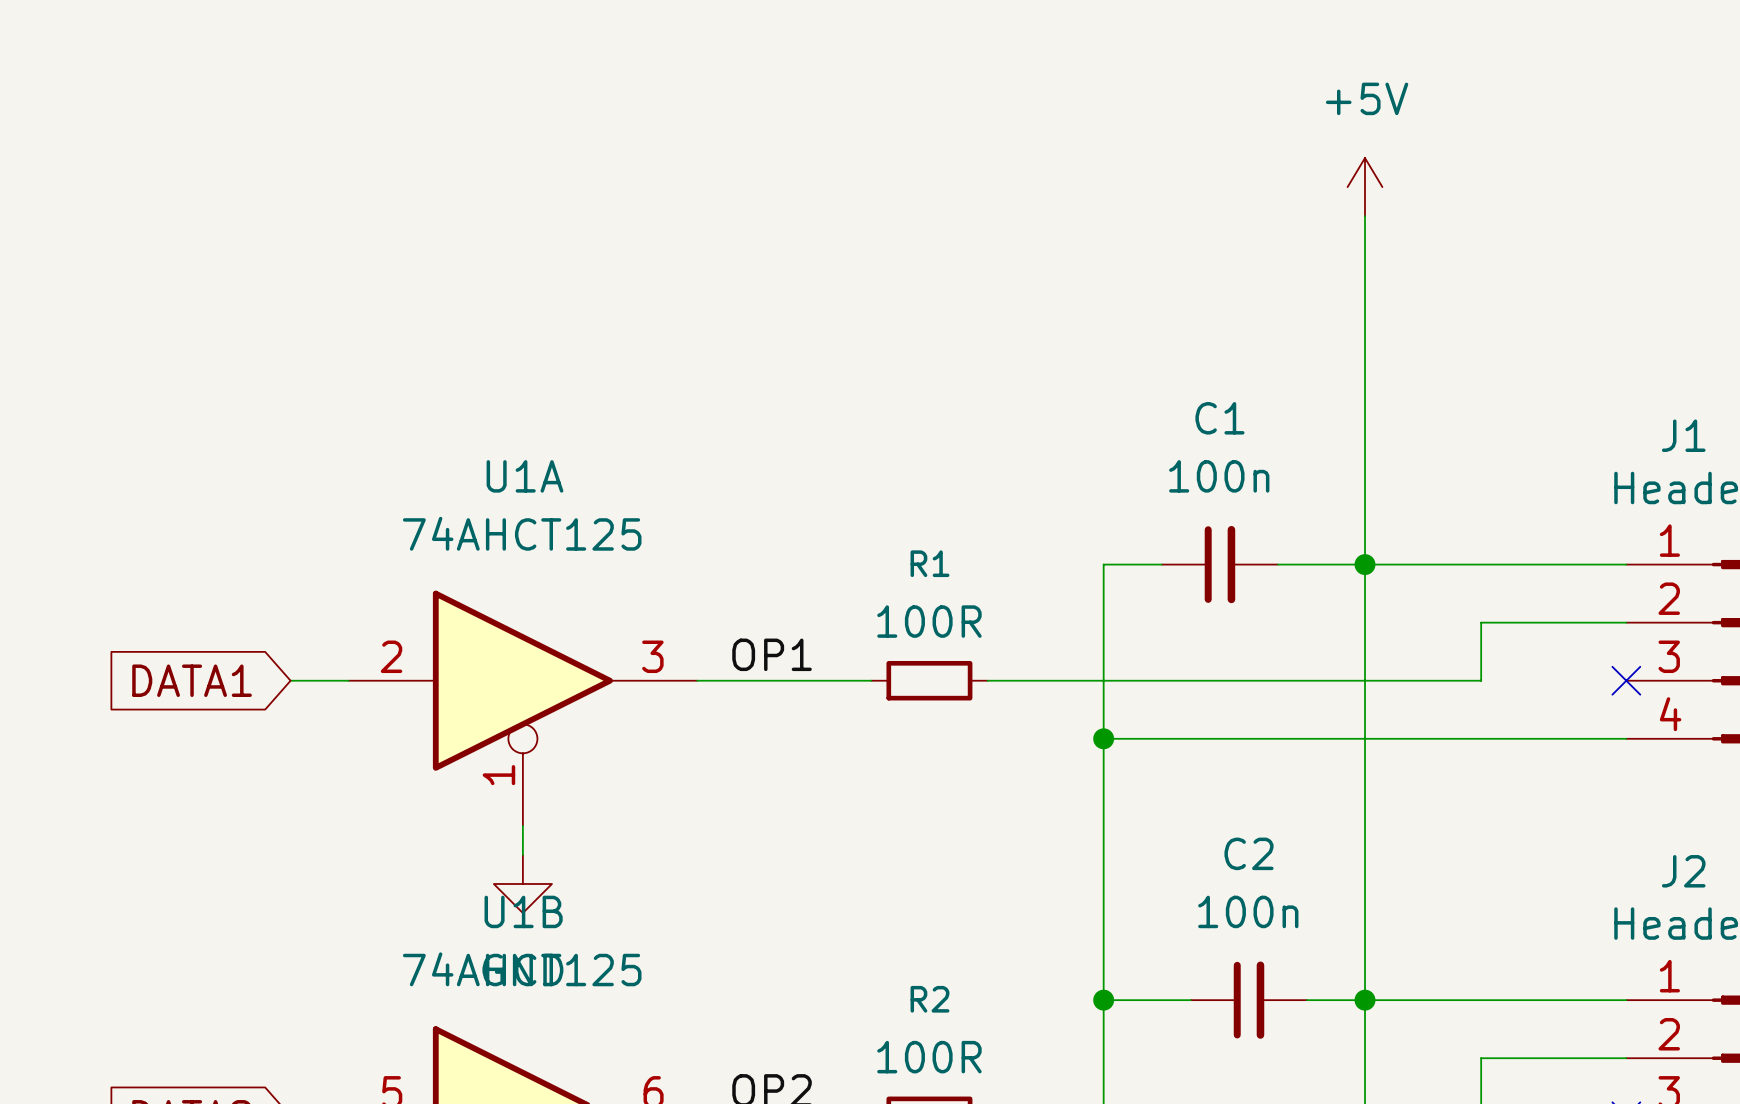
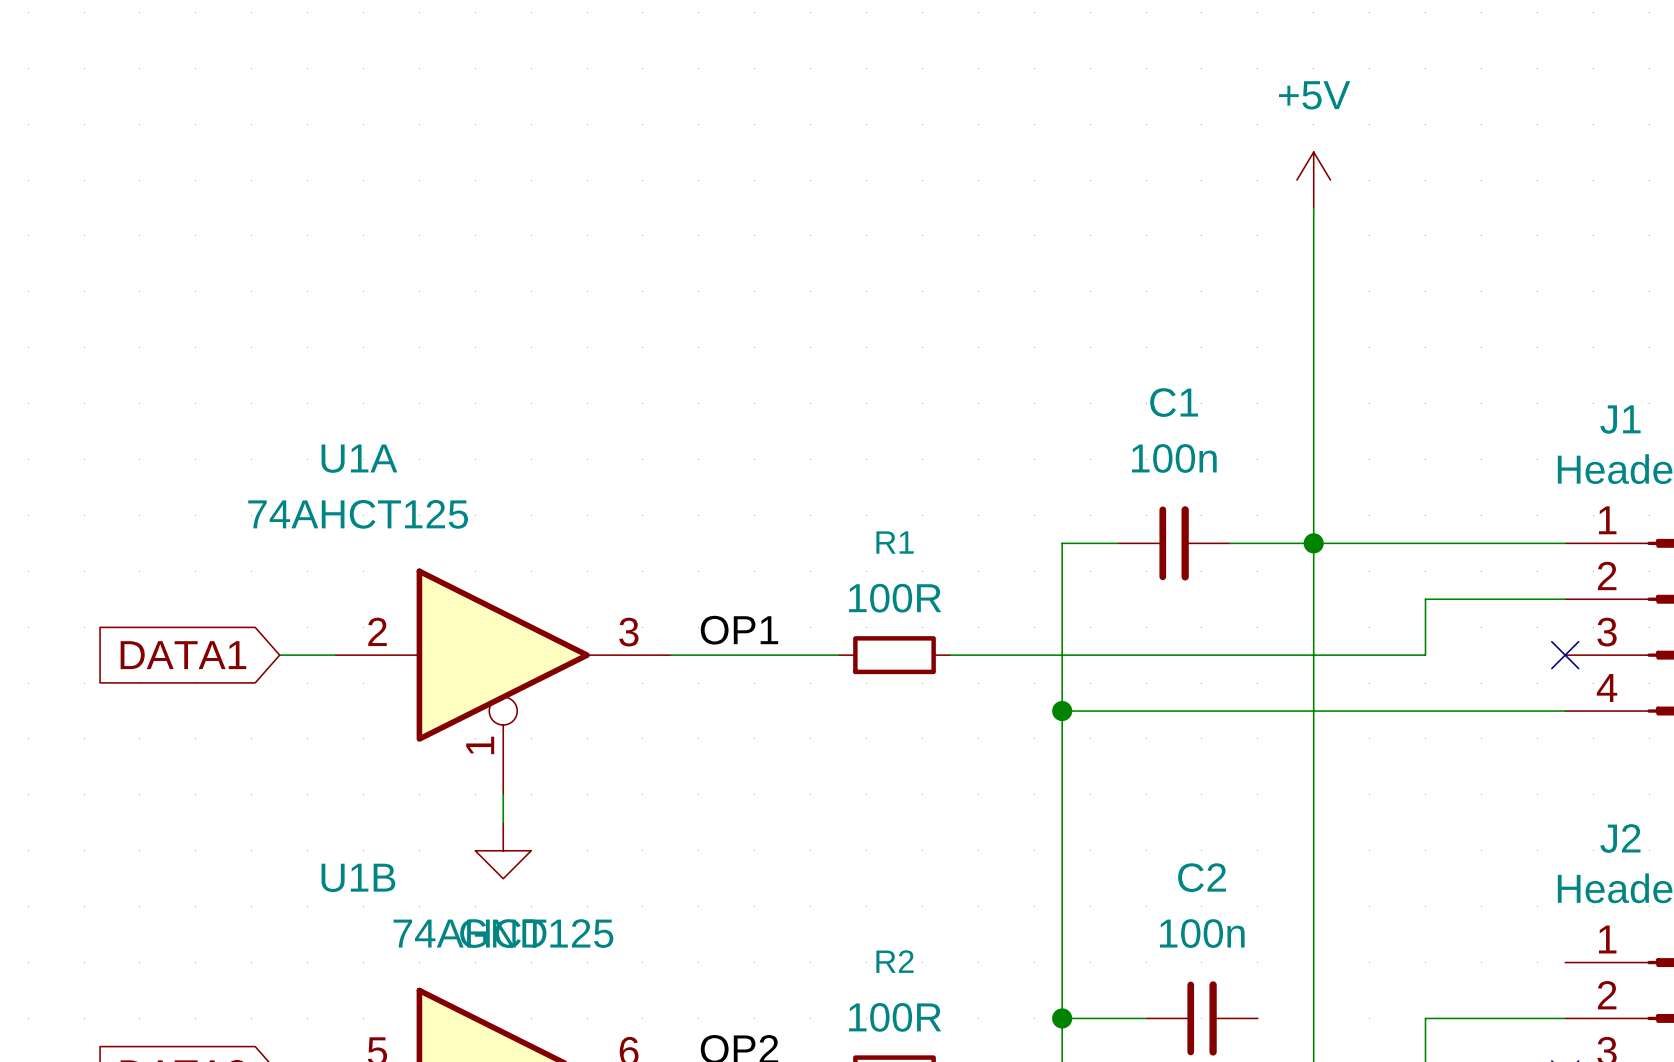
U1A name position: U1A (524, 476) -> U1A (359, 458)
U1A value position: 74AHCT125 (522, 533) -> 74AHCT125 (358, 514)
U1B name position: U1B (523, 911) -> U1B (358, 877)
wire: (1103, 1000) (1190, 1000) -> (1062, 1018) (1146, 1018)
junction: (1103, 1000) -> none
C2 position: (1248, 1000) -> (1201, 1018)
wire: (1306, 1000) (1626, 1000) -> none
junction: (1365, 1000) -> none
junction: none -> (1062, 1018)

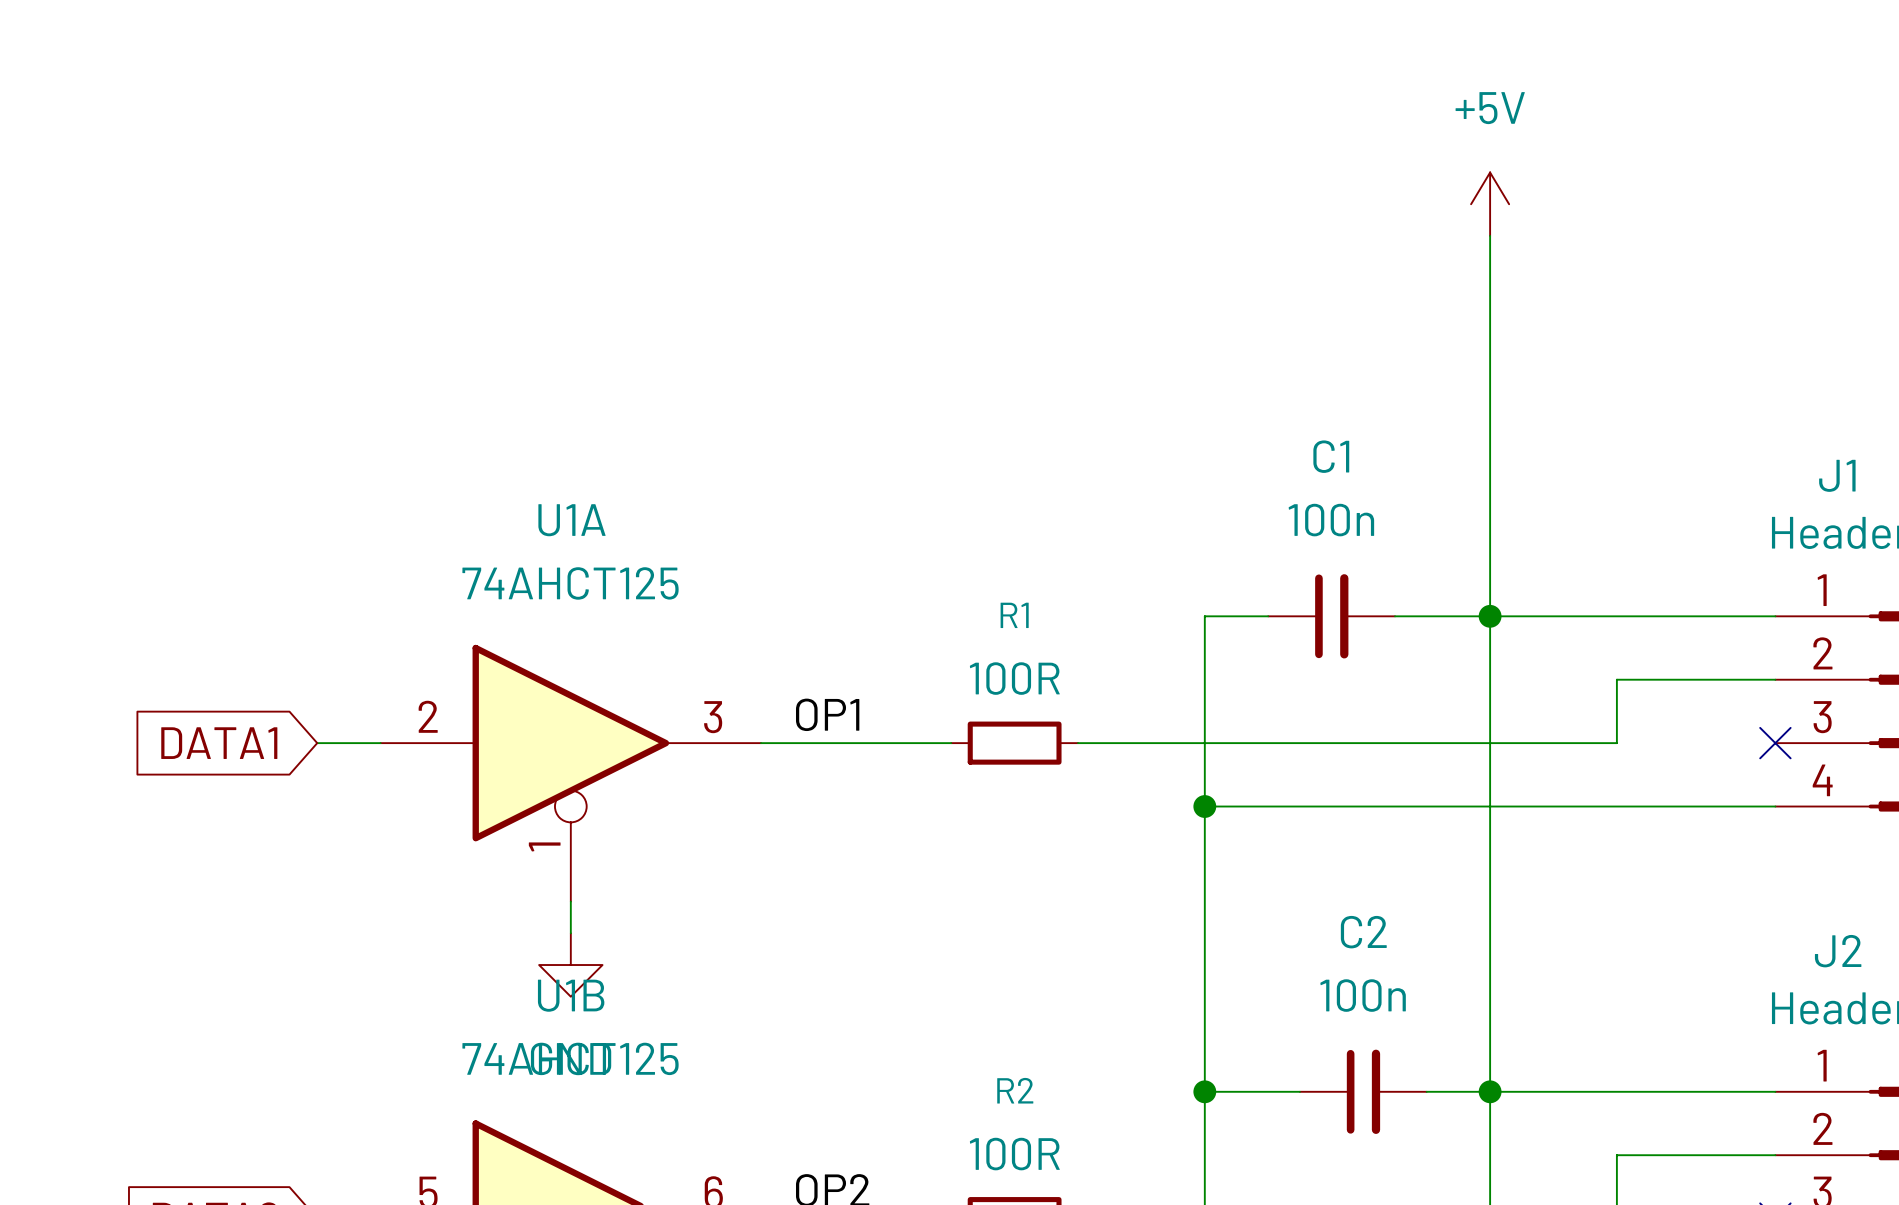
U1A name position: U1A (359, 458) -> U1A (571, 520)
U1A value position: 74AHCT125 (358, 514) -> 74AHCT125 (570, 583)
U1B name position: U1B (358, 877) -> U1B (571, 995)
junction: none -> (1204, 1091)
wire: none -> (1426, 1091) (1775, 1091)
junction: none -> (1490, 1091)
wire: (1062, 1018) (1146, 1018) -> (1204, 1091) (1299, 1091)
junction: (1062, 1018) -> none
C2 position: (1201, 1018) -> (1363, 1091)

